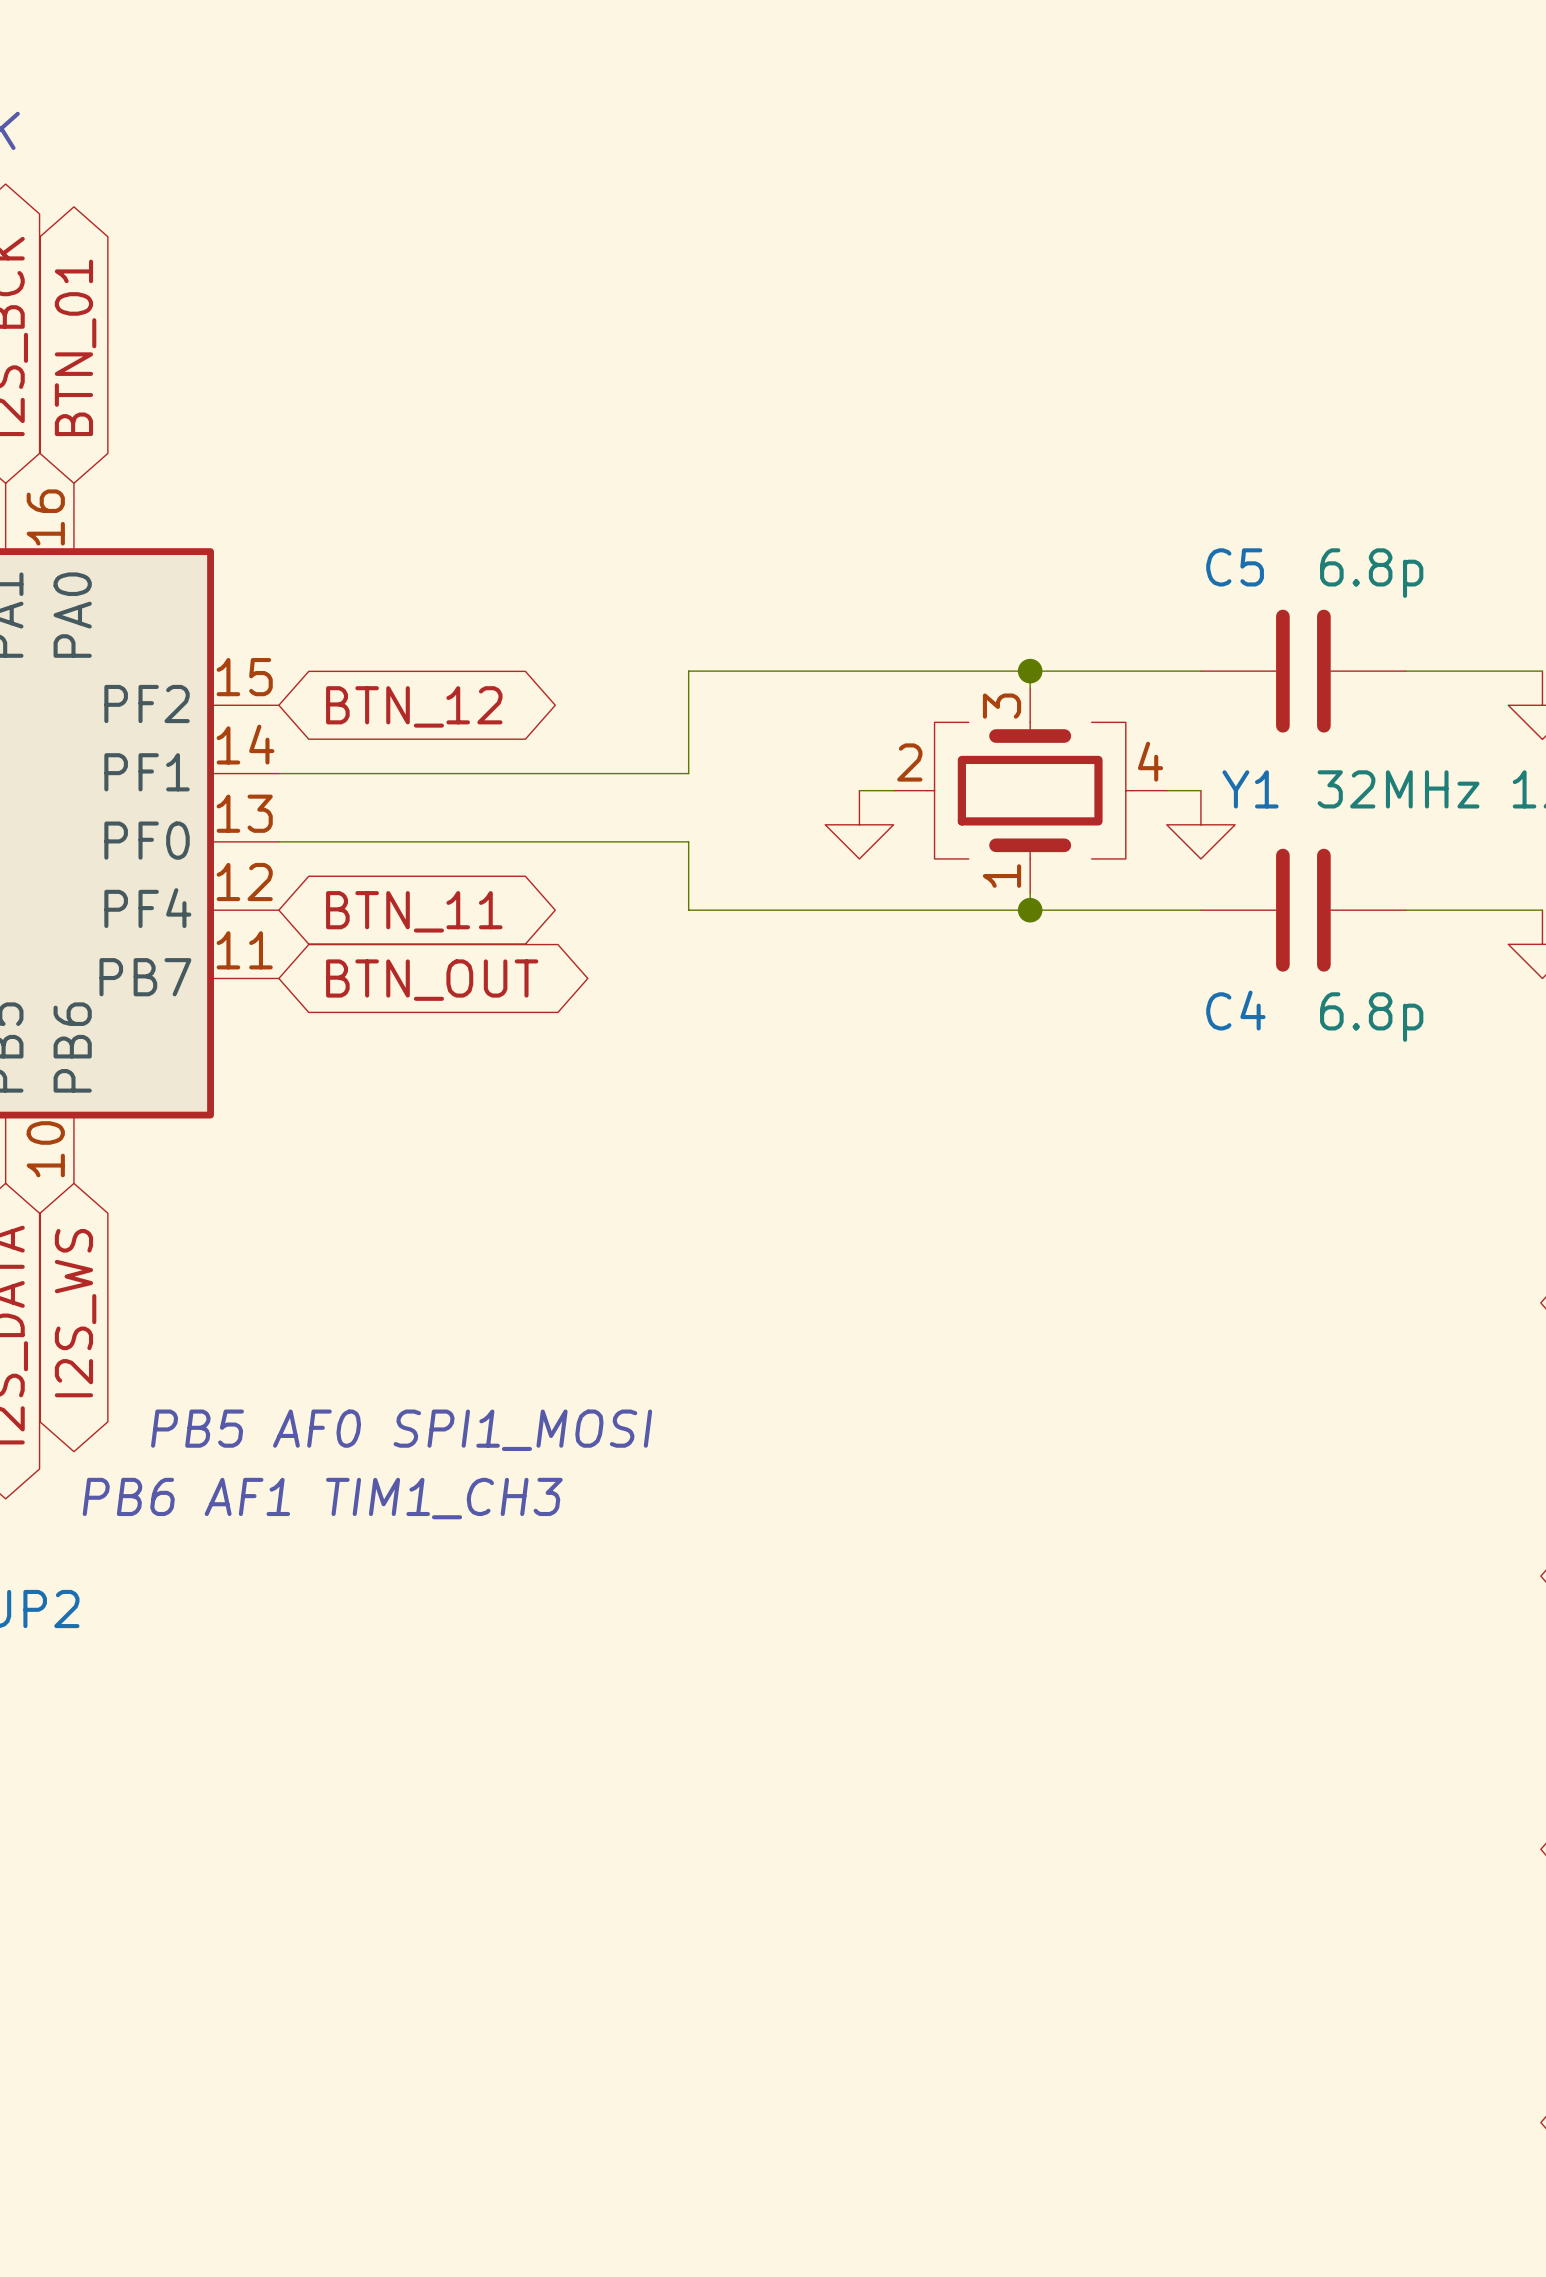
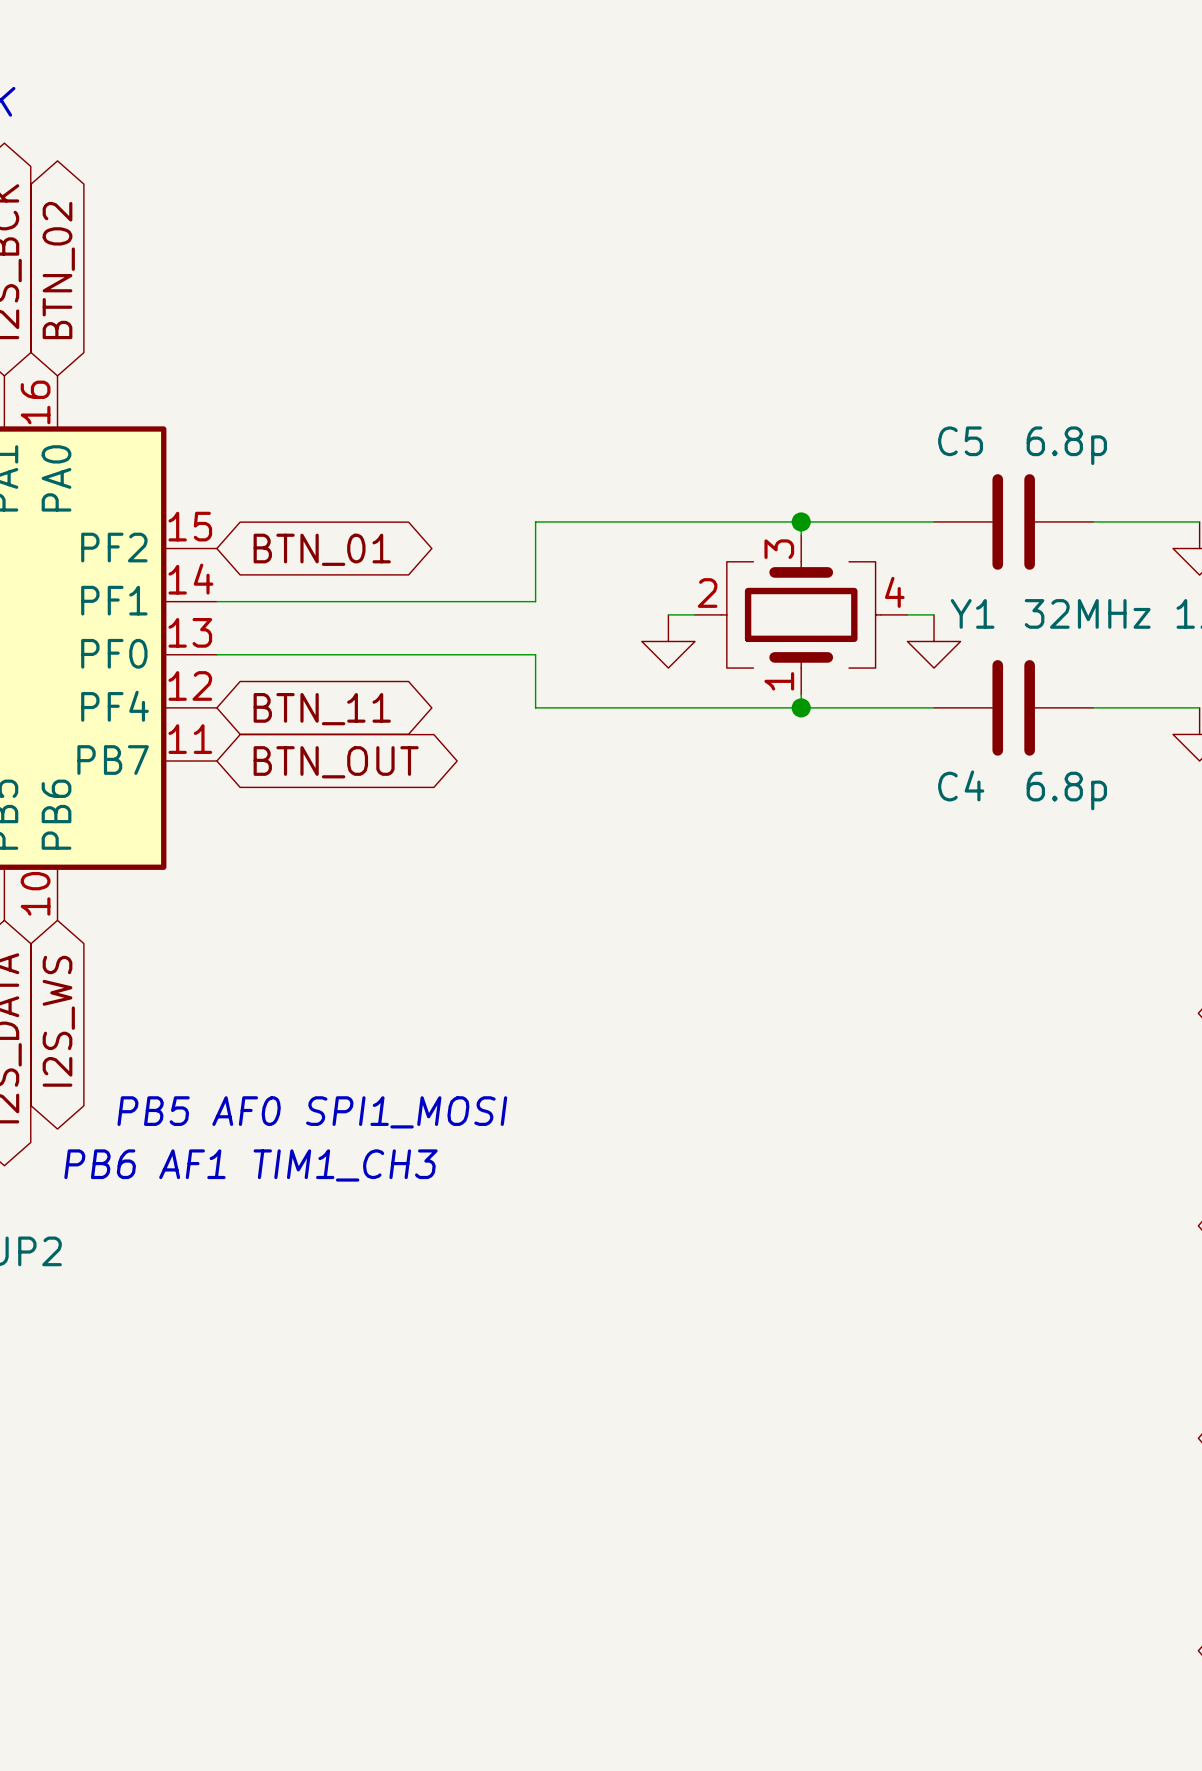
global label: BTN_01 (75, 347) -> BTN_02 (58, 270)
global label: BTN_12 (414, 706) -> BTN_01 (322, 549)

